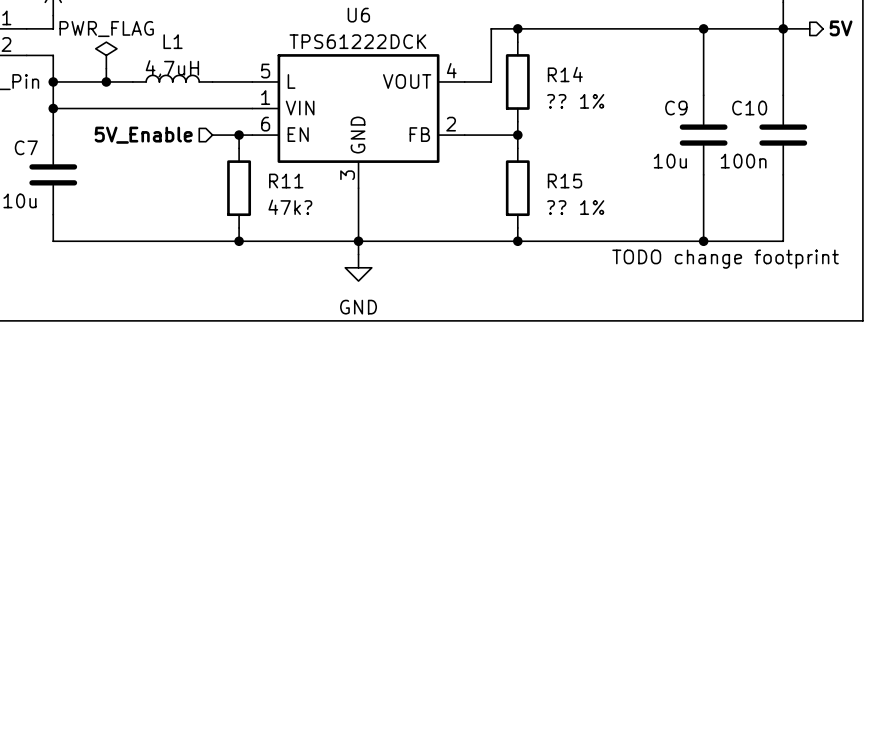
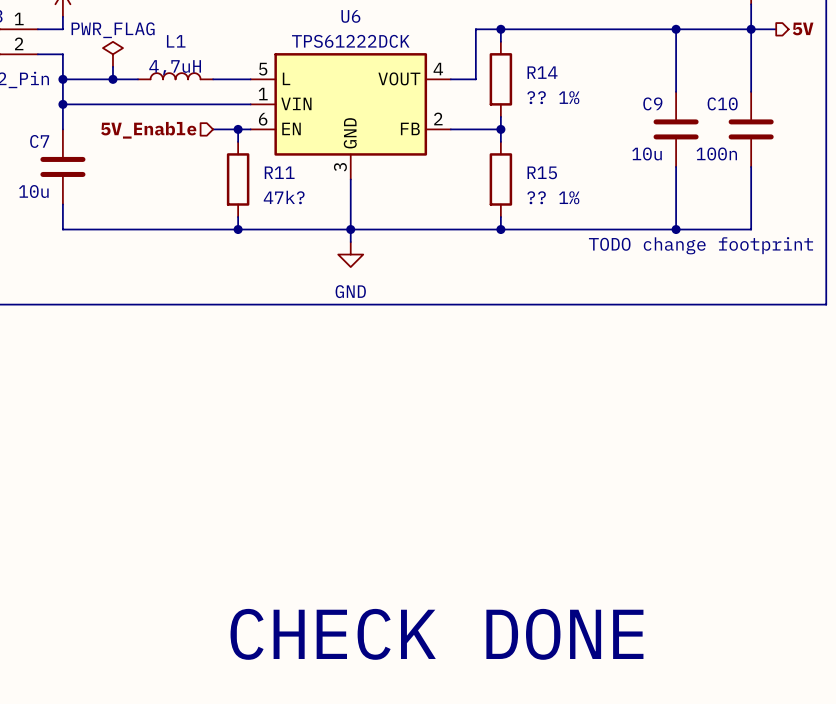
text: none -> CHECK DONE (437, 634)

